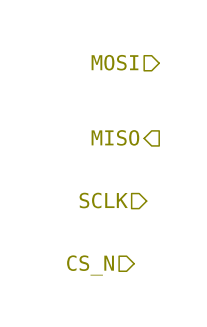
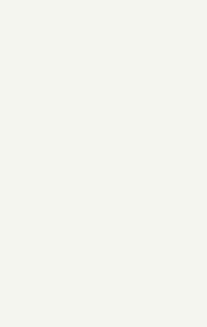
hierarchical label: MOSI (114, 62) -> none
hierarchical label: MISO (115, 137) -> none
hierarchical label: SCLK (103, 200) -> none
hierarchical label: CS_N (90, 265) -> none

